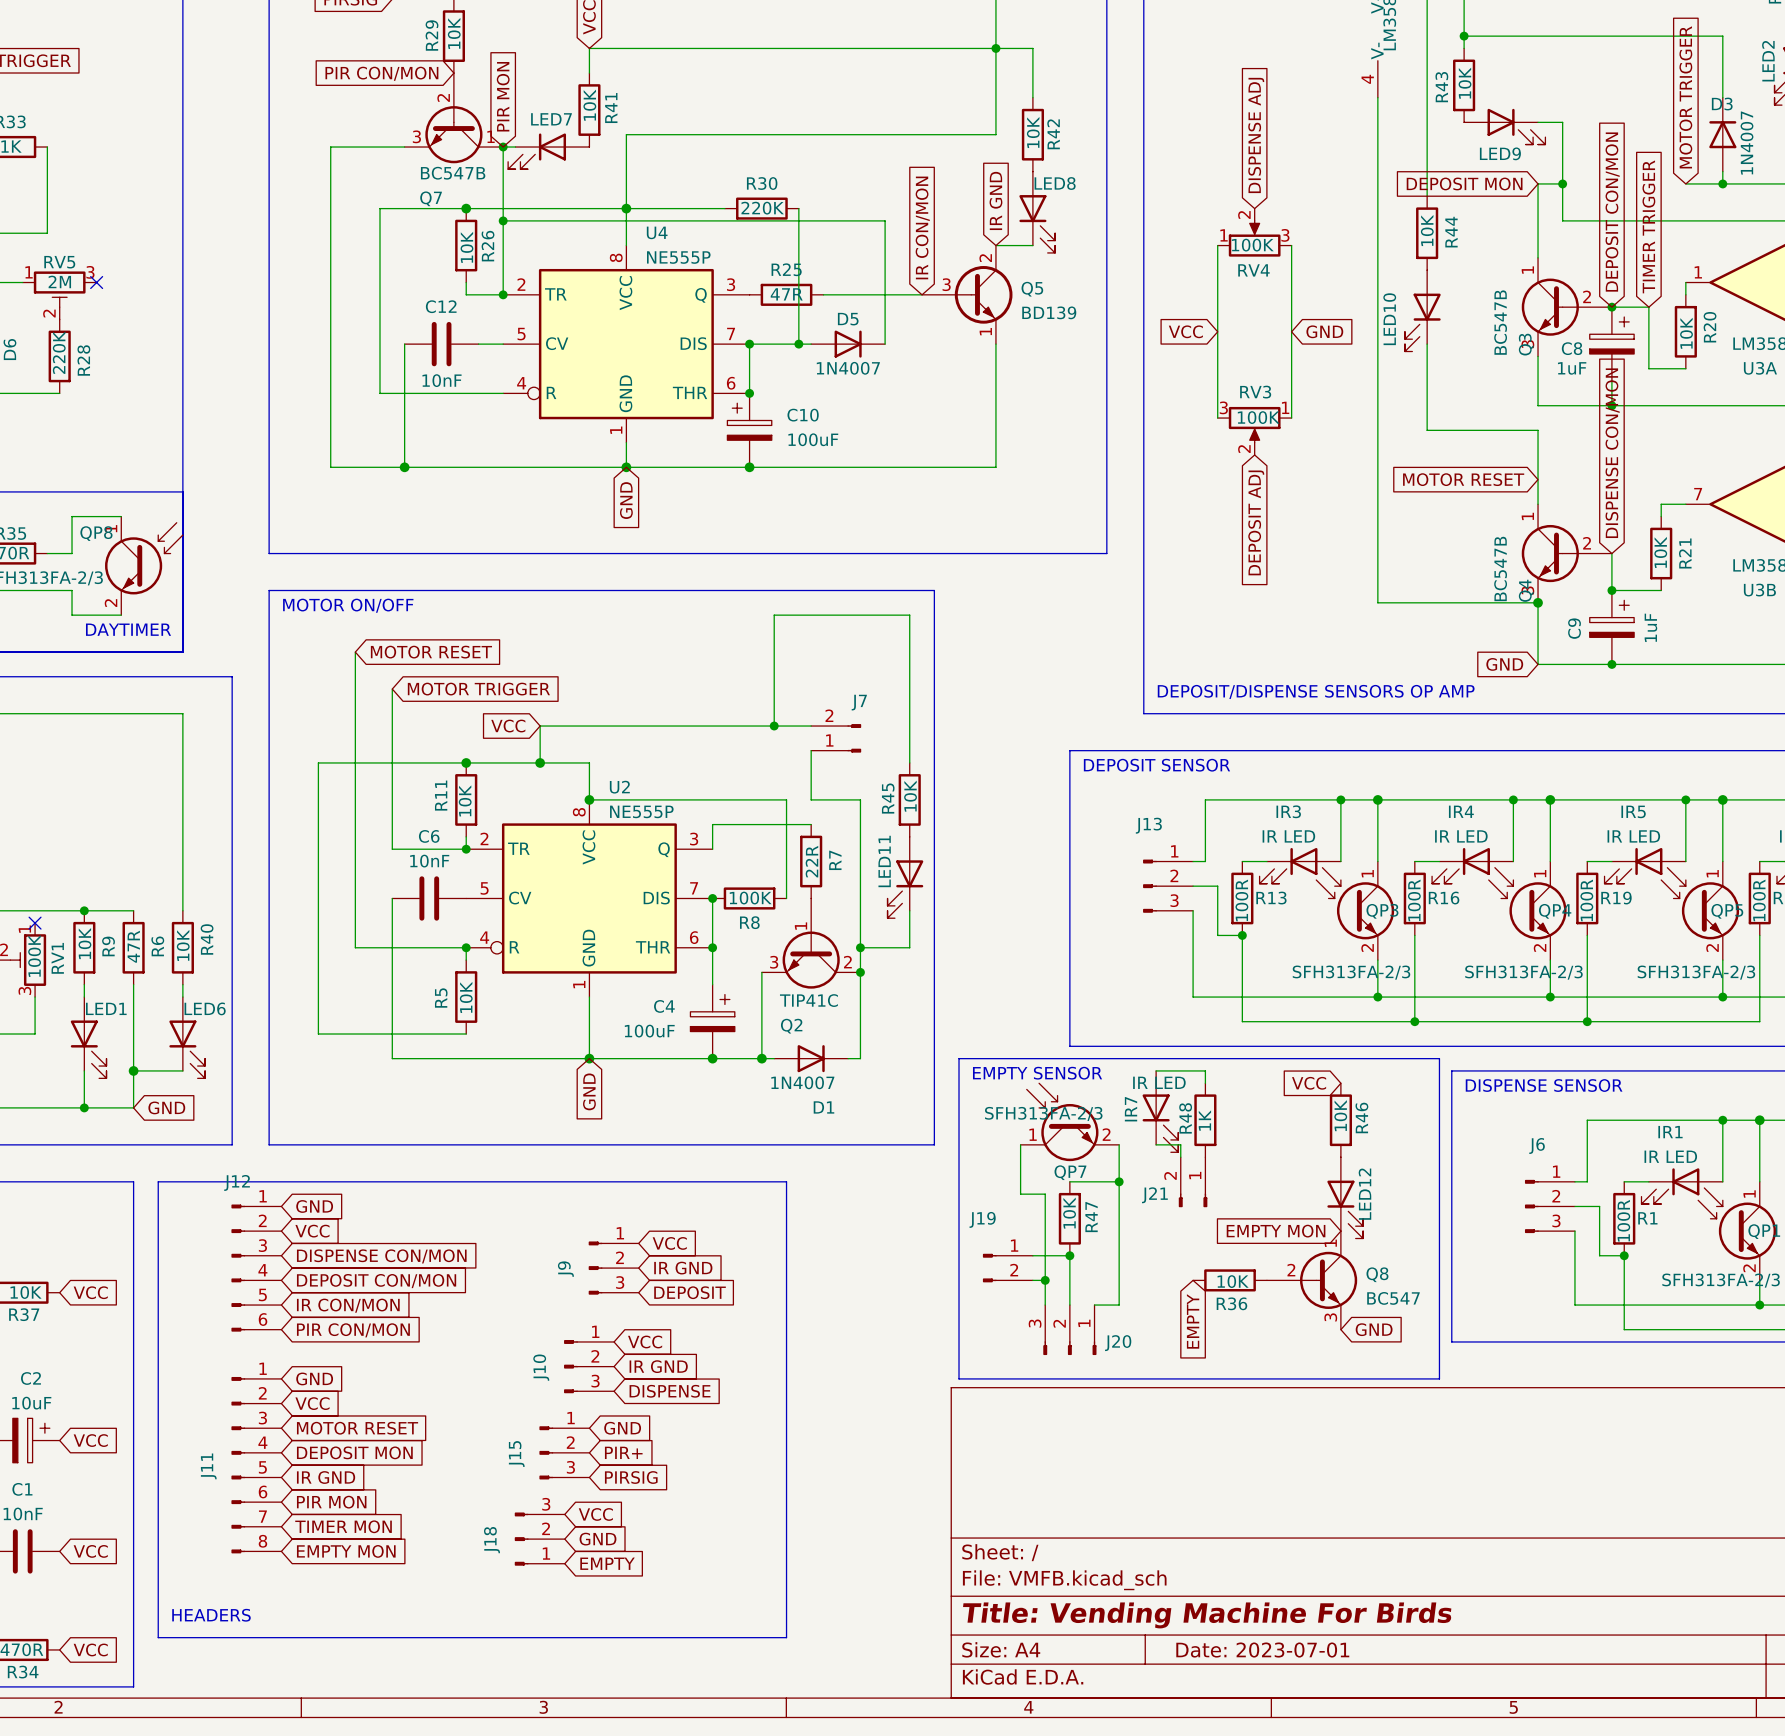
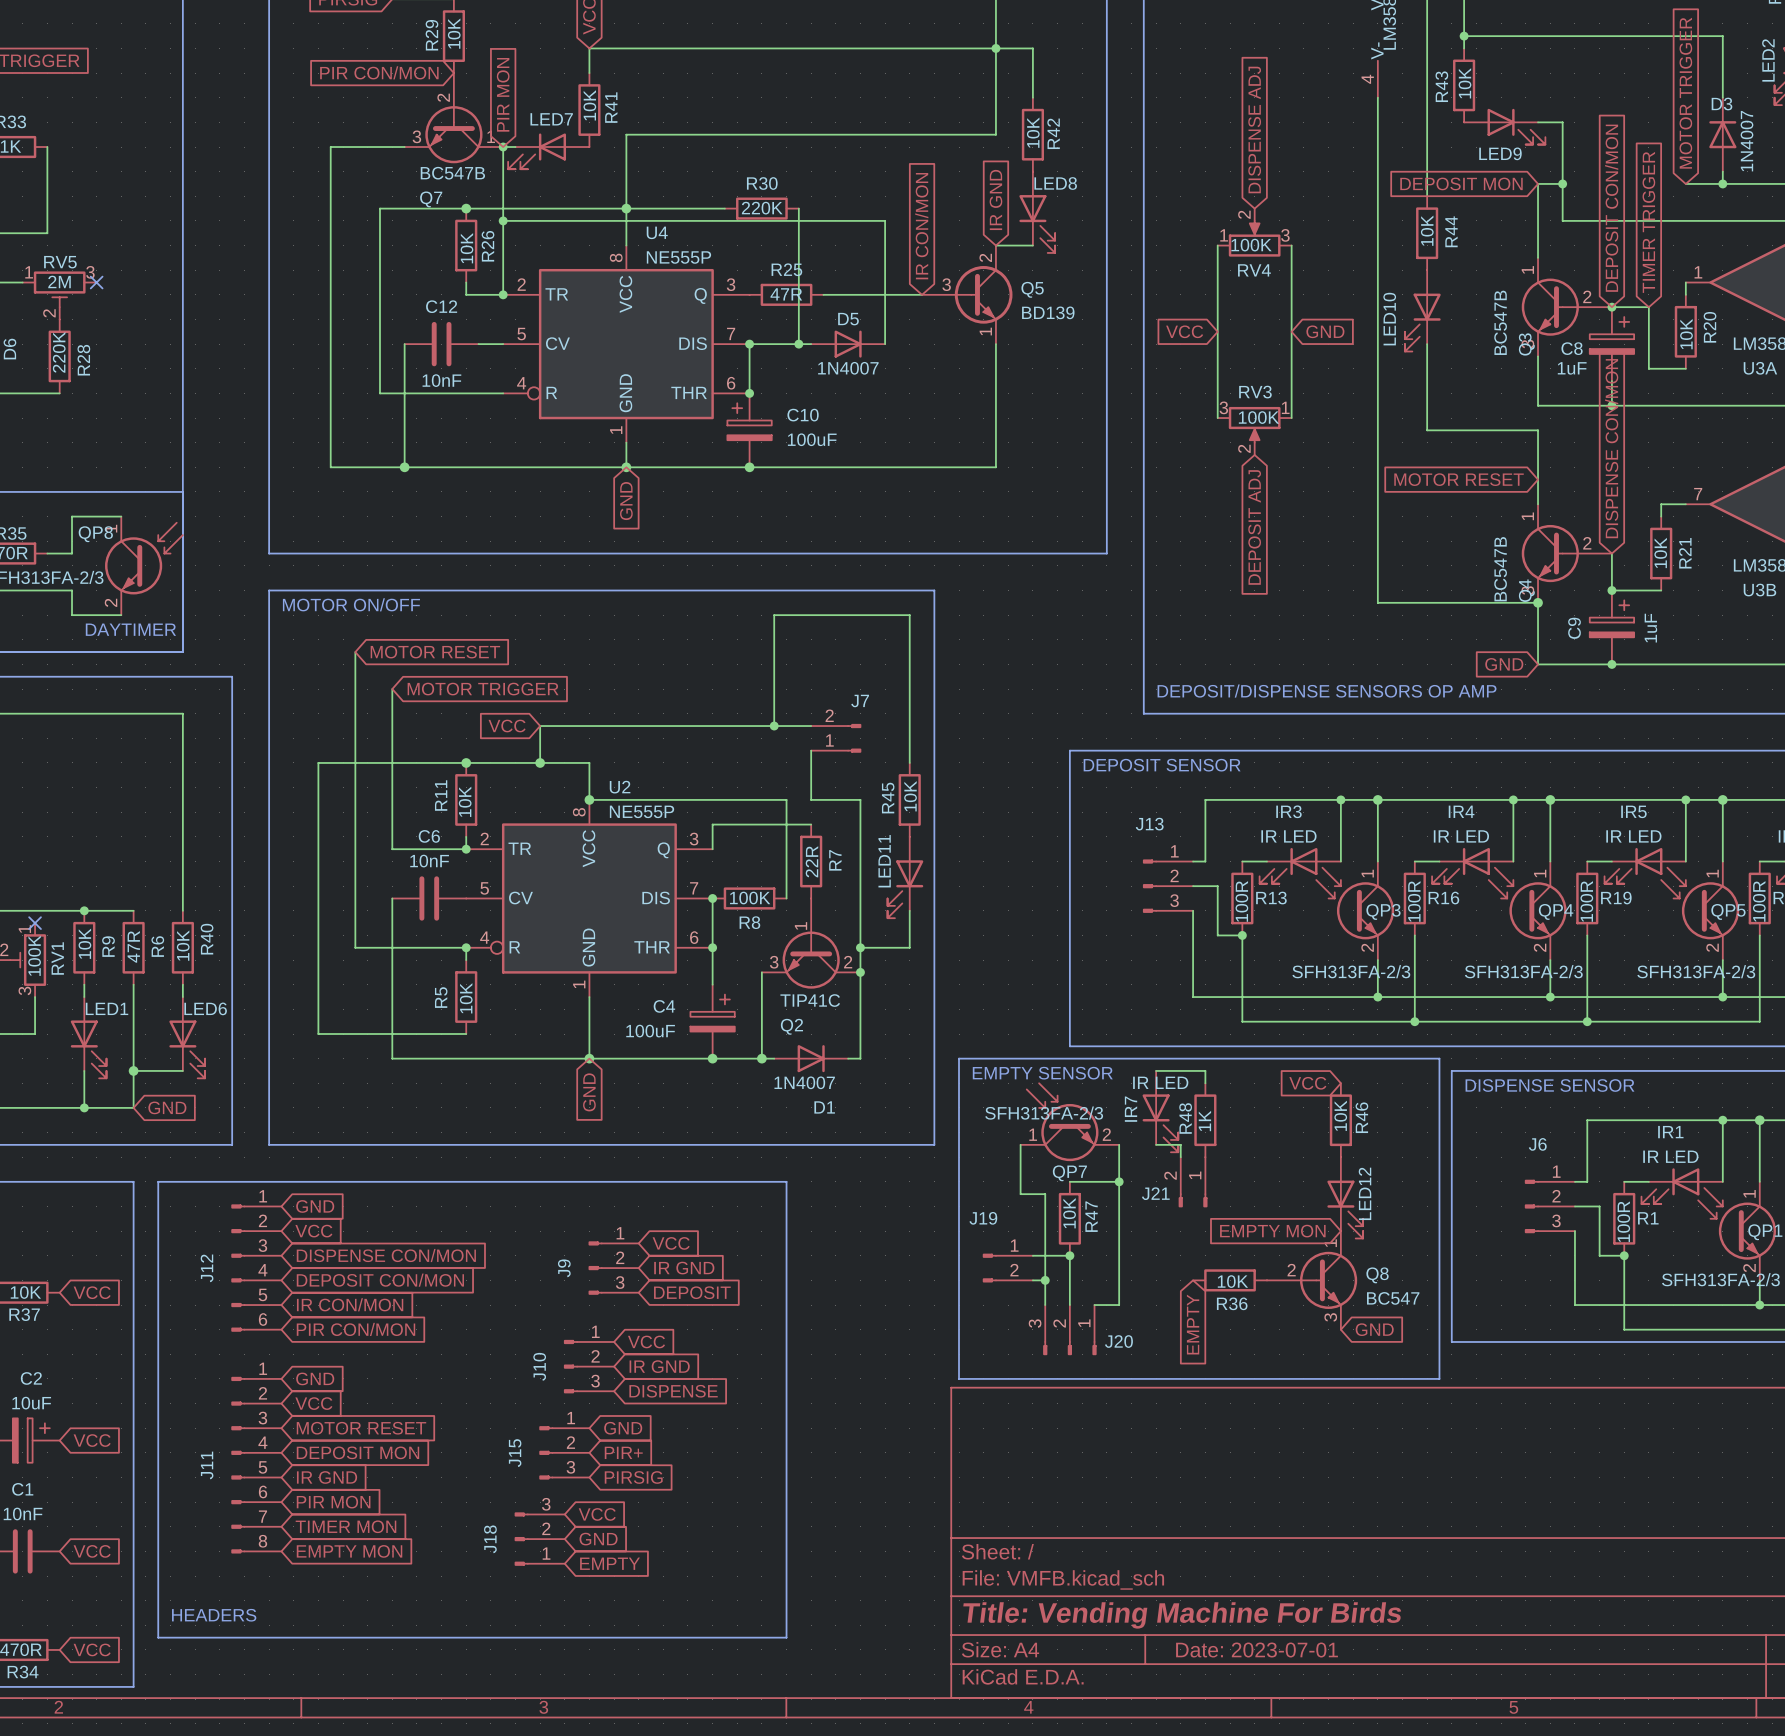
J12 name rotation: 0° (237, 1182) -> 90° counterclockwise (207, 1268)
J12 name position: J12 (237, 1182) -> J12 (207, 1268)

